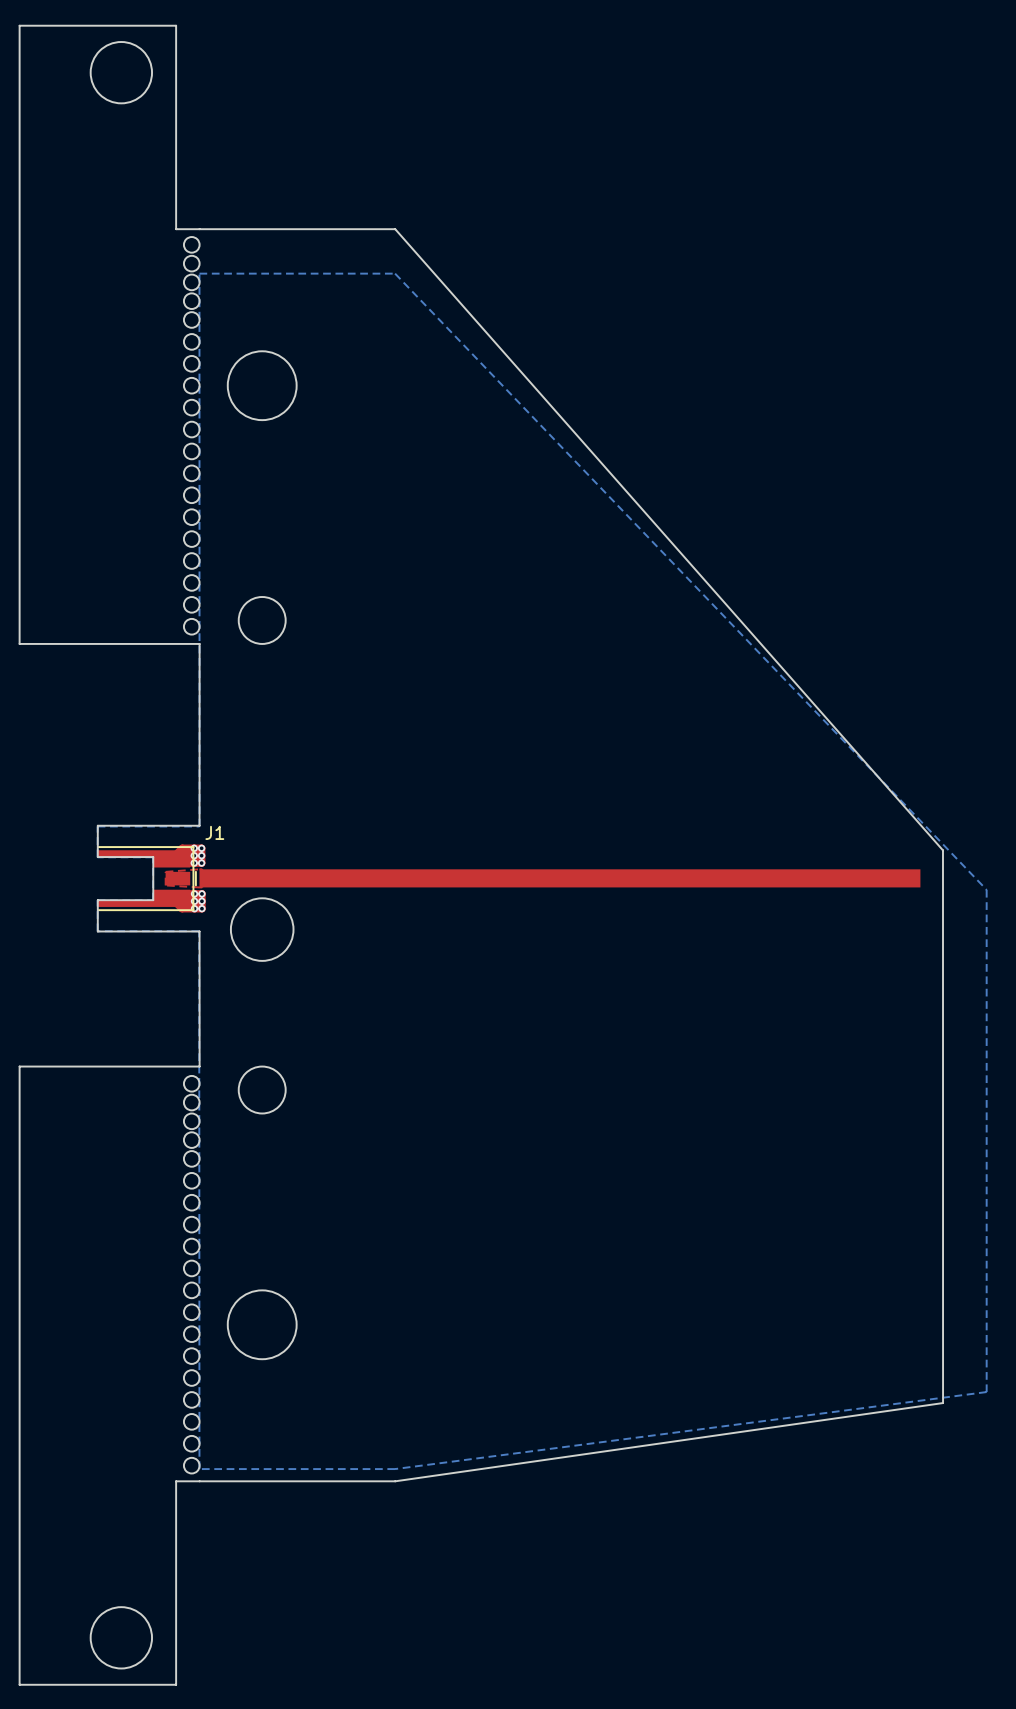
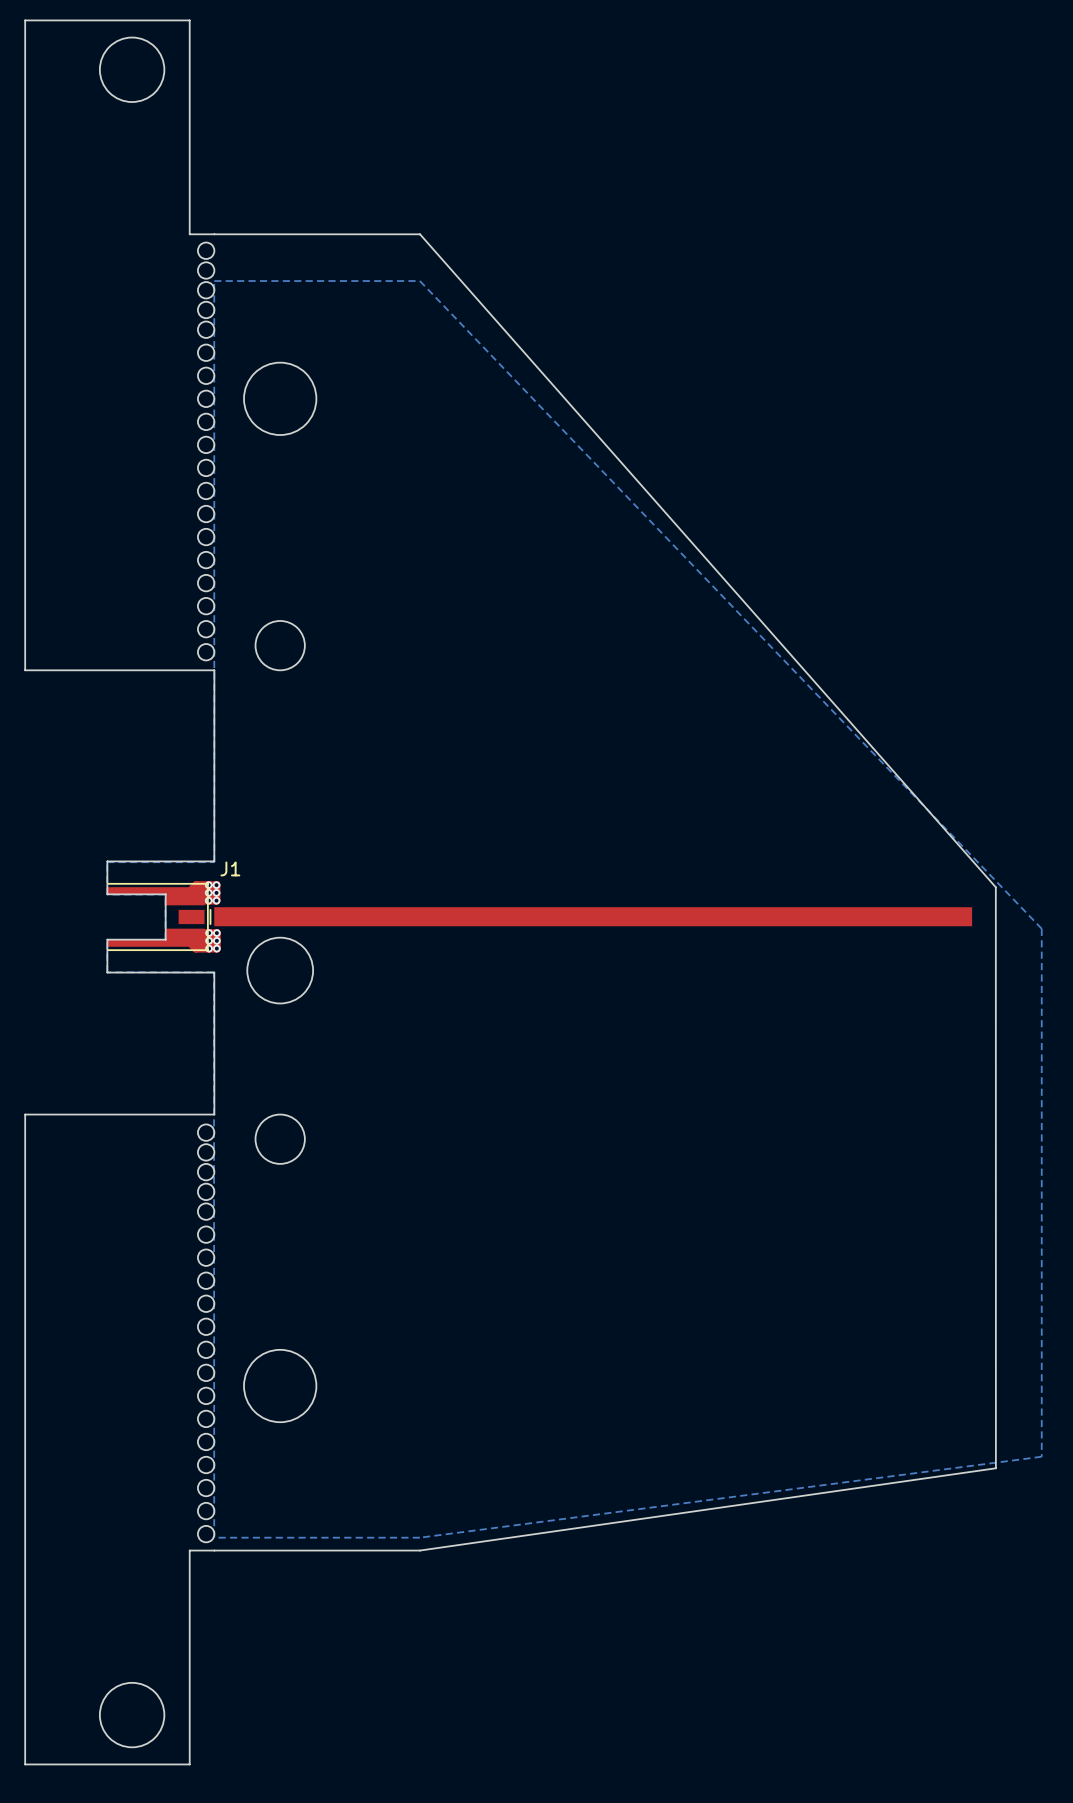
top zone outline: (199, 869) (165, 871) (165, 885) (202, 887) (202, 869) (199, 869) -> none

